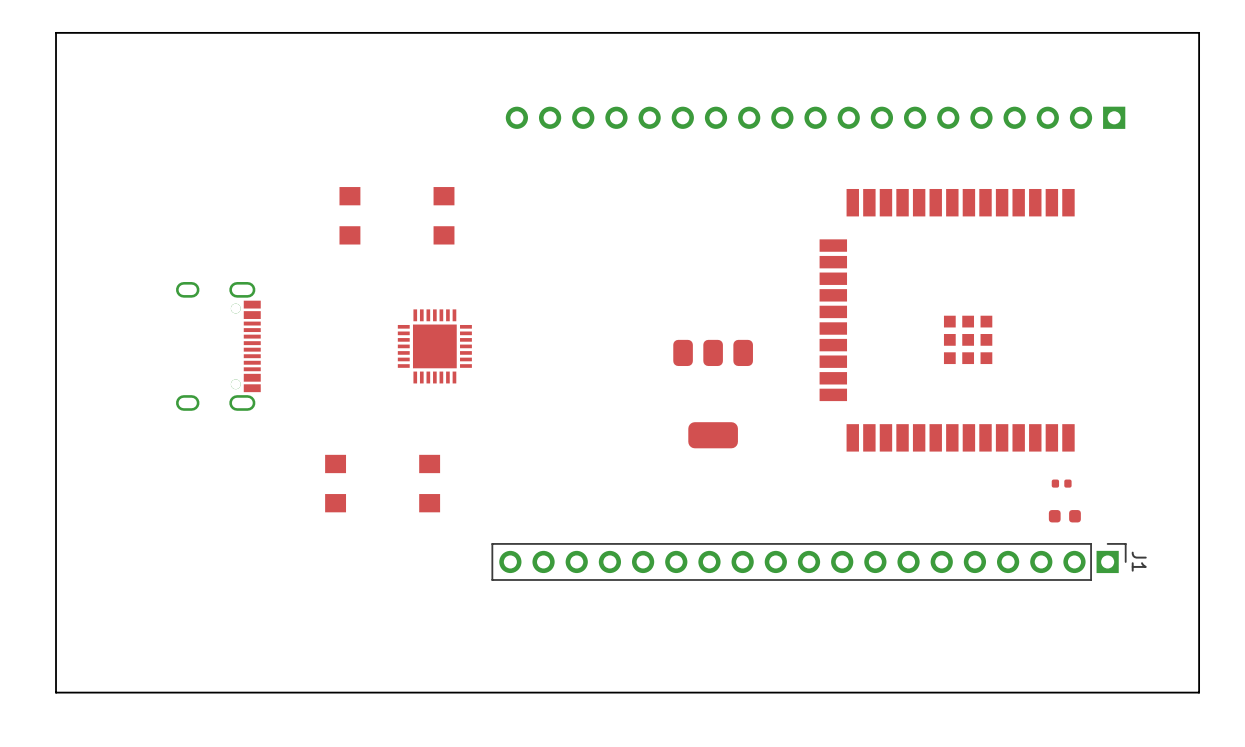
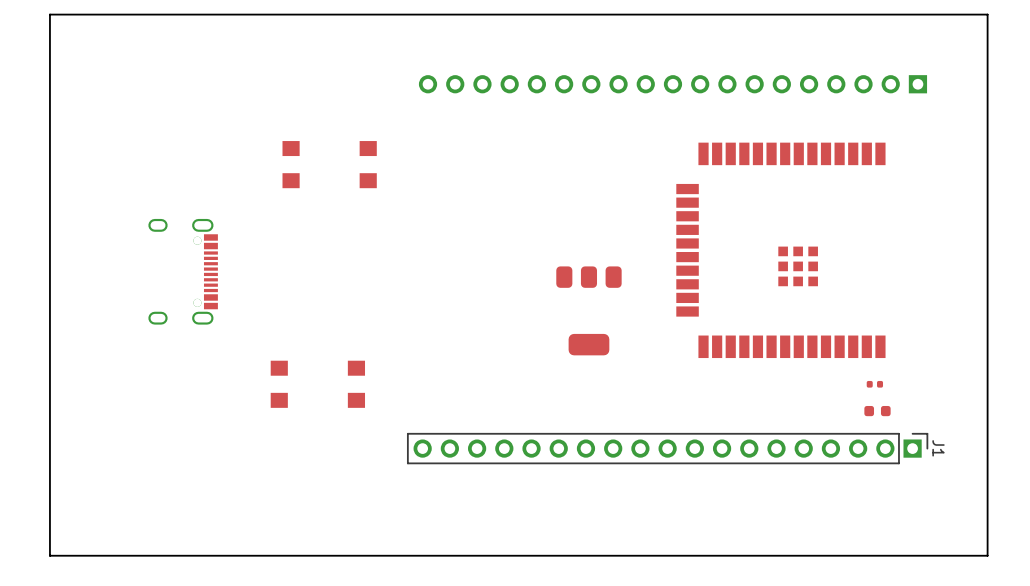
part: (434, 346) -> none

